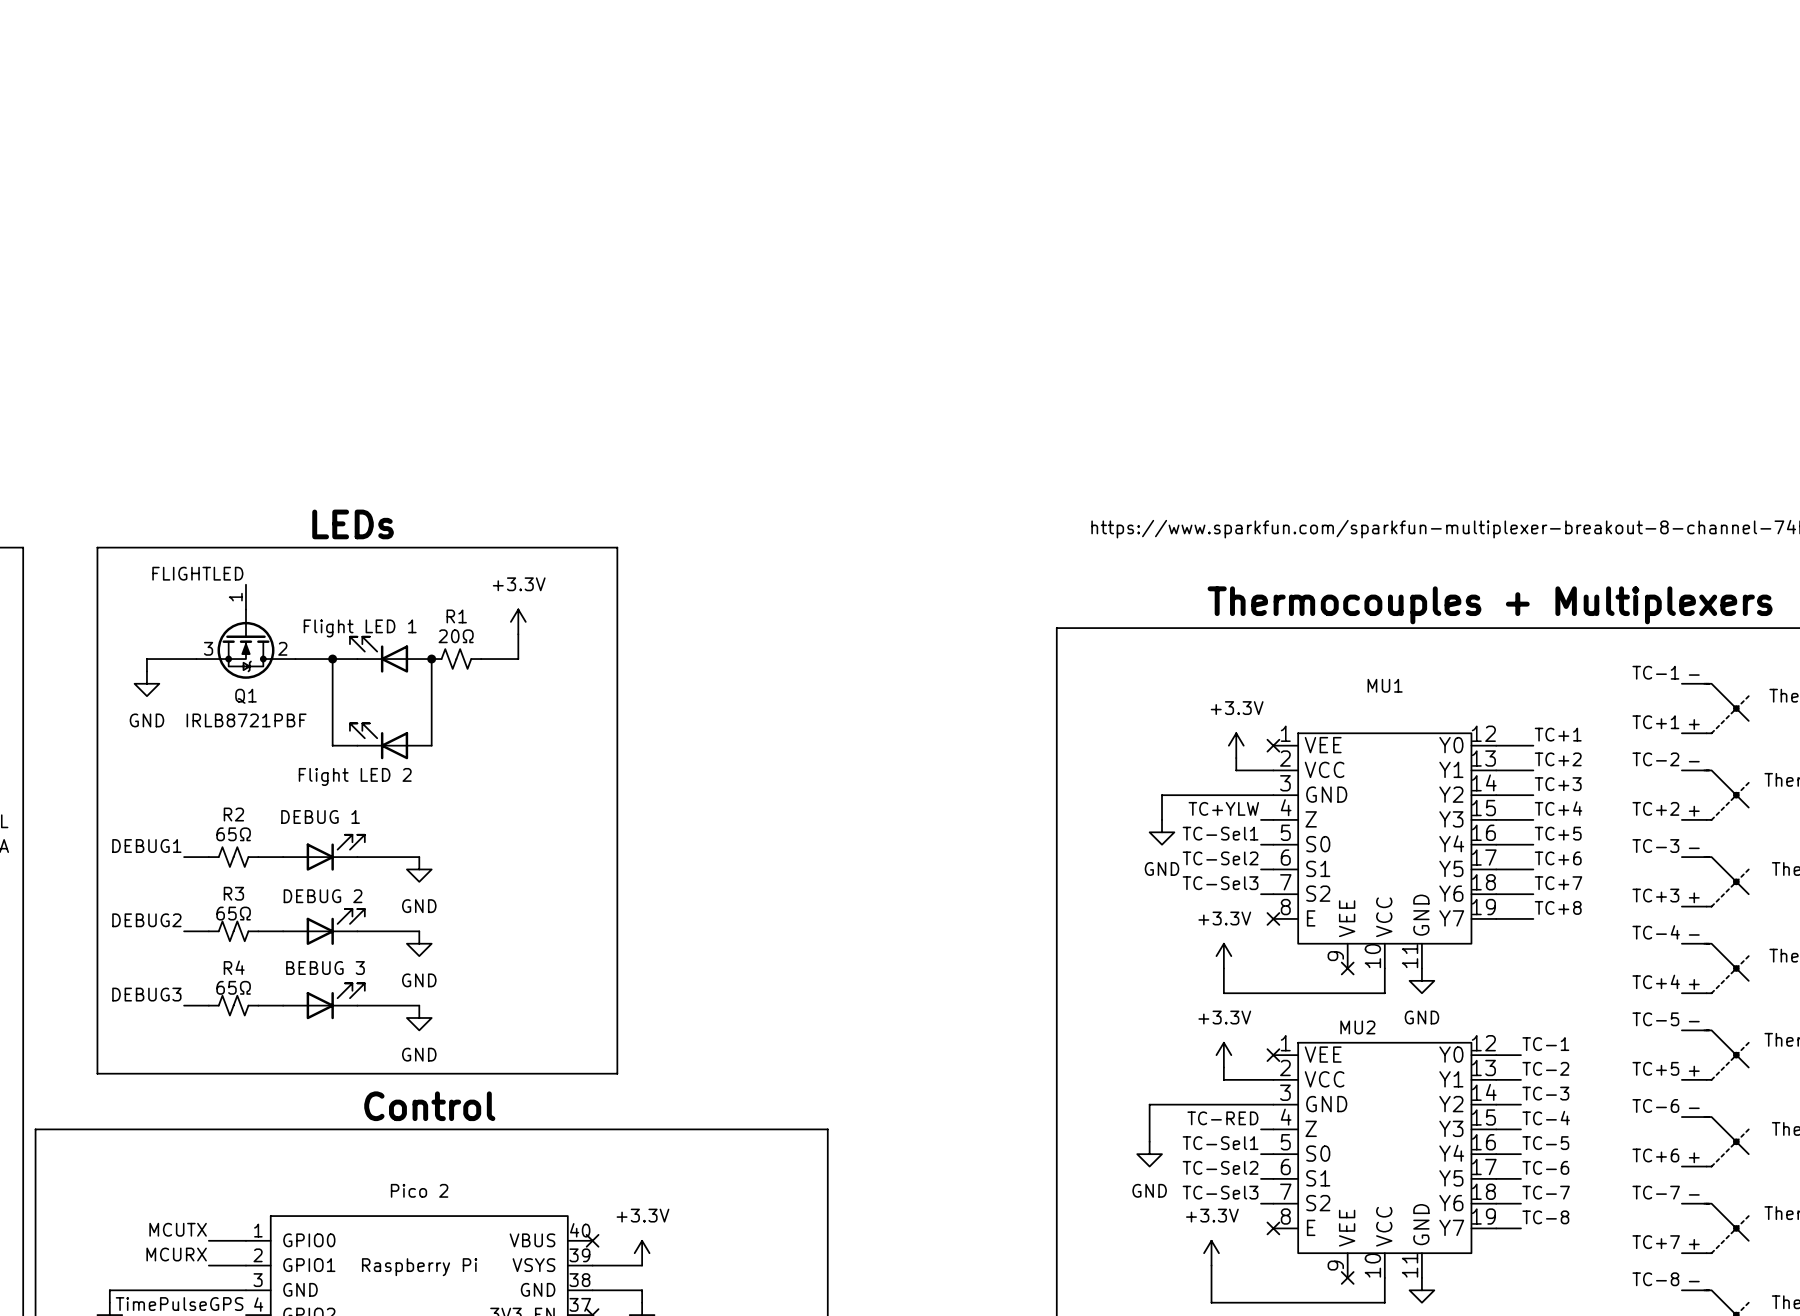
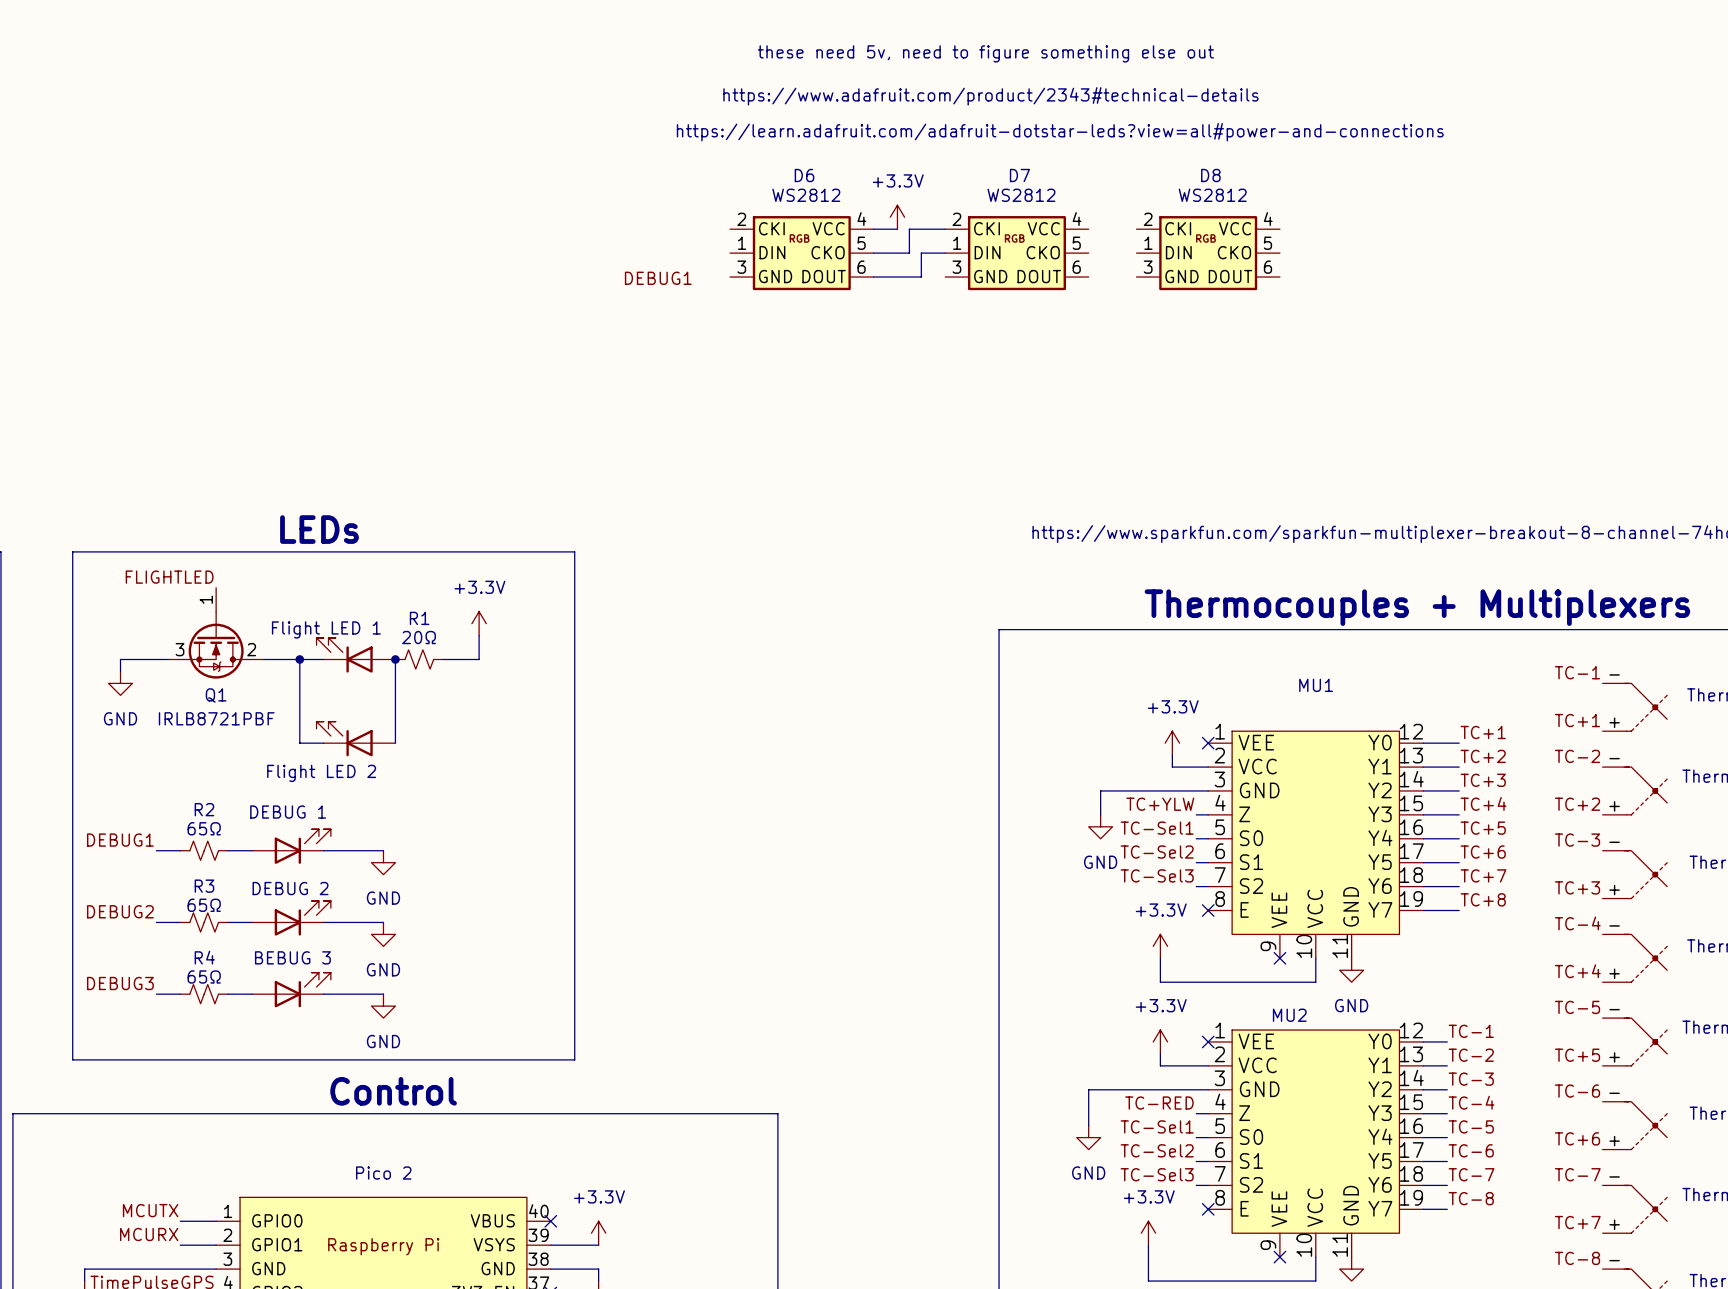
text: none -> these need 5v, need to figure something else out (985, 53)
text: none -> https://www.adafruit.com/product/2343#technical-details (990, 96)
text: none -> https://learn.adafruit.com/adafruit-dotstar-leds?view=all#power-and-connections (1060, 132)
power symbol: none -> +3.3V (897, 217)
wire: none -> (873, 229) (897, 229)
wire: none -> (945, 229) (909, 229) (909, 253) (873, 253)
D6: none -> WS2812 (801, 253)
wire: none -> (945, 253) (921, 253) (921, 277) (873, 277)
D7: none -> WS2812 (1016, 253)
D8: none -> WS2812 (1208, 253)
label: none -> DEBUG1 (658, 278)

